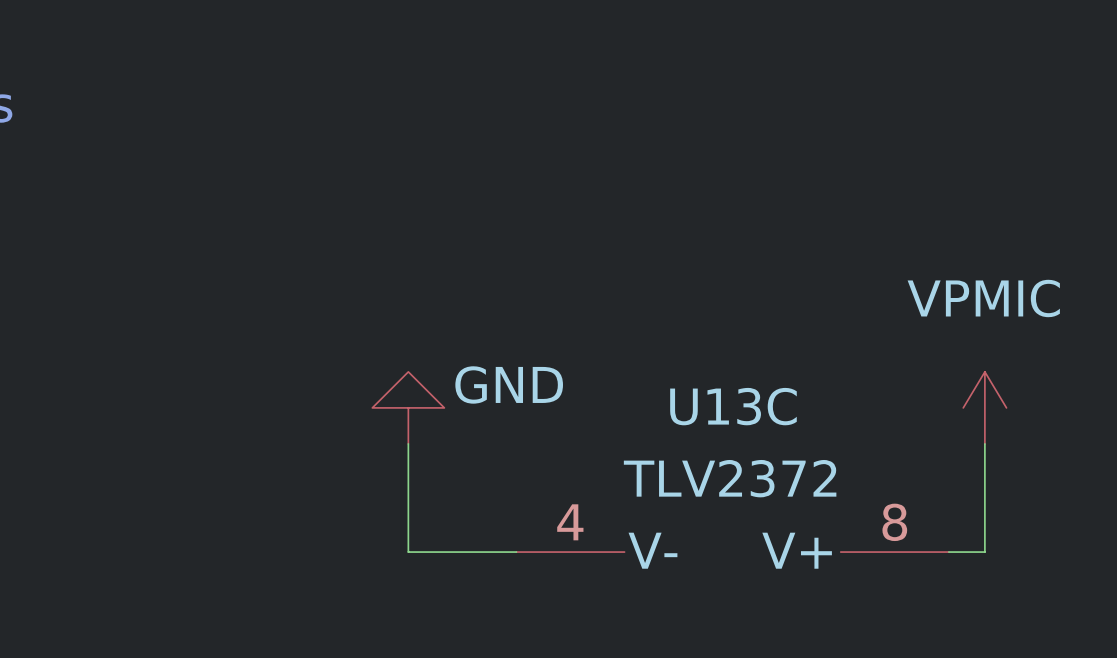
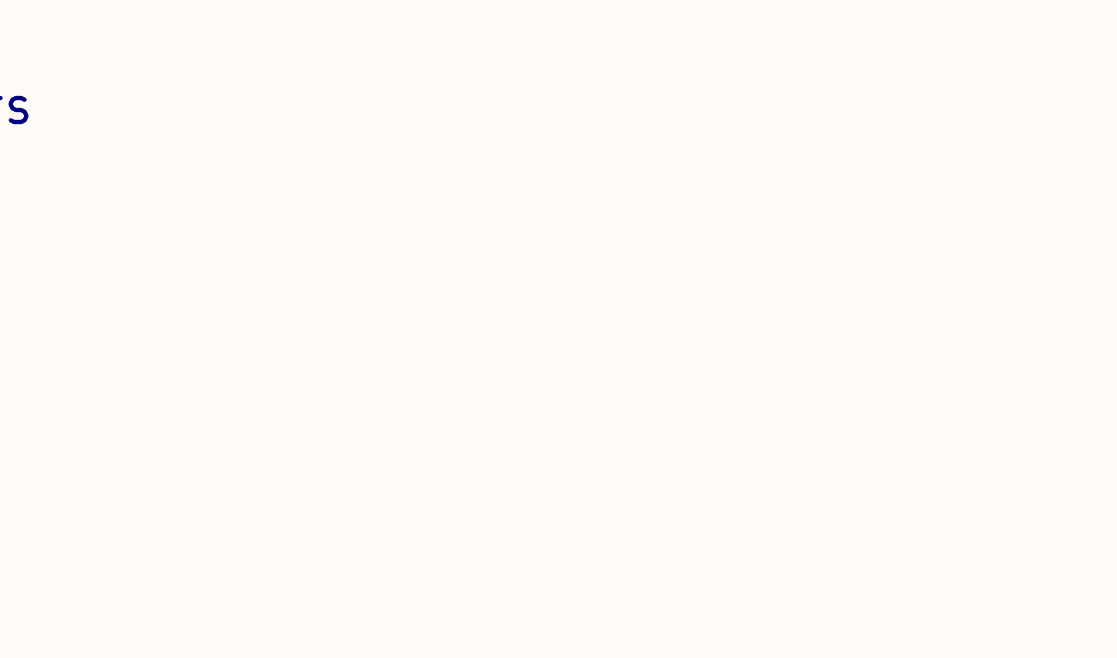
power symbol: GND (408, 407) -> none
power symbol: VPMIC (984, 407) -> none
wire: (408, 443) (408, 552) (516, 552) -> none
wire: (984, 443) (984, 552) (948, 552) -> none
U13C: TLV2372 (732, 552) -> none

